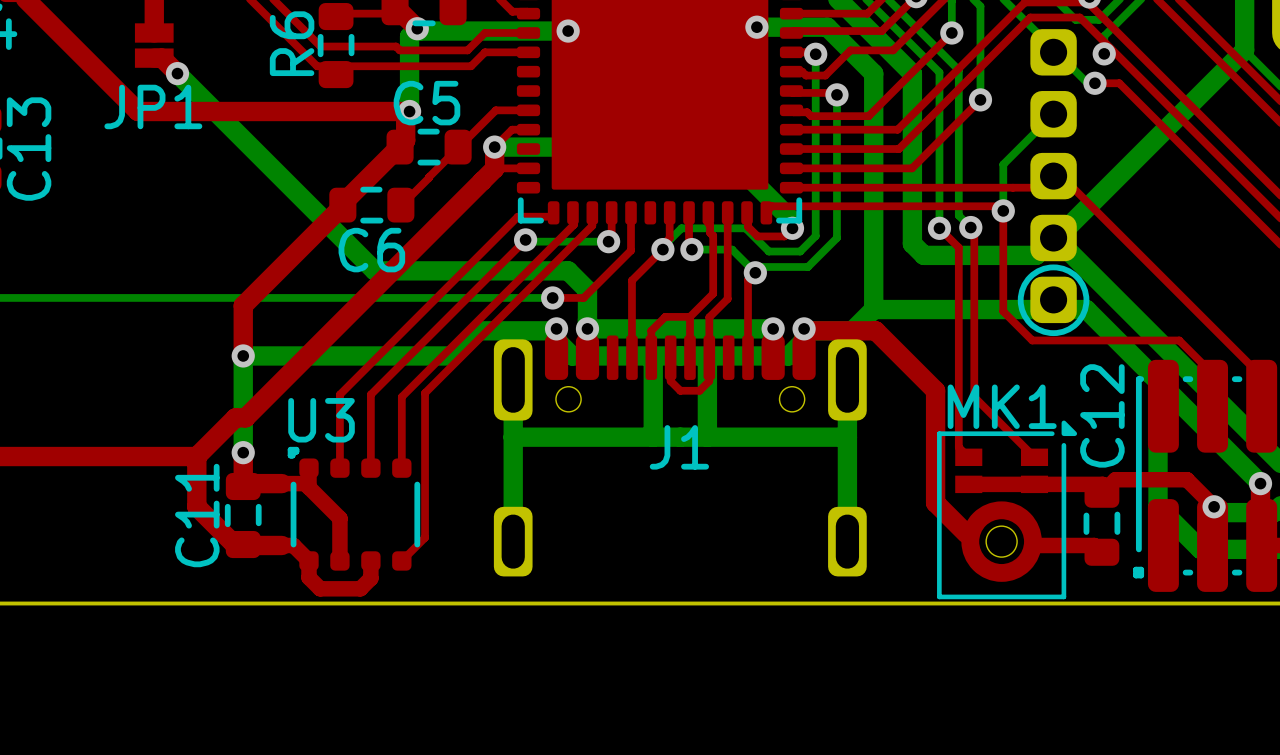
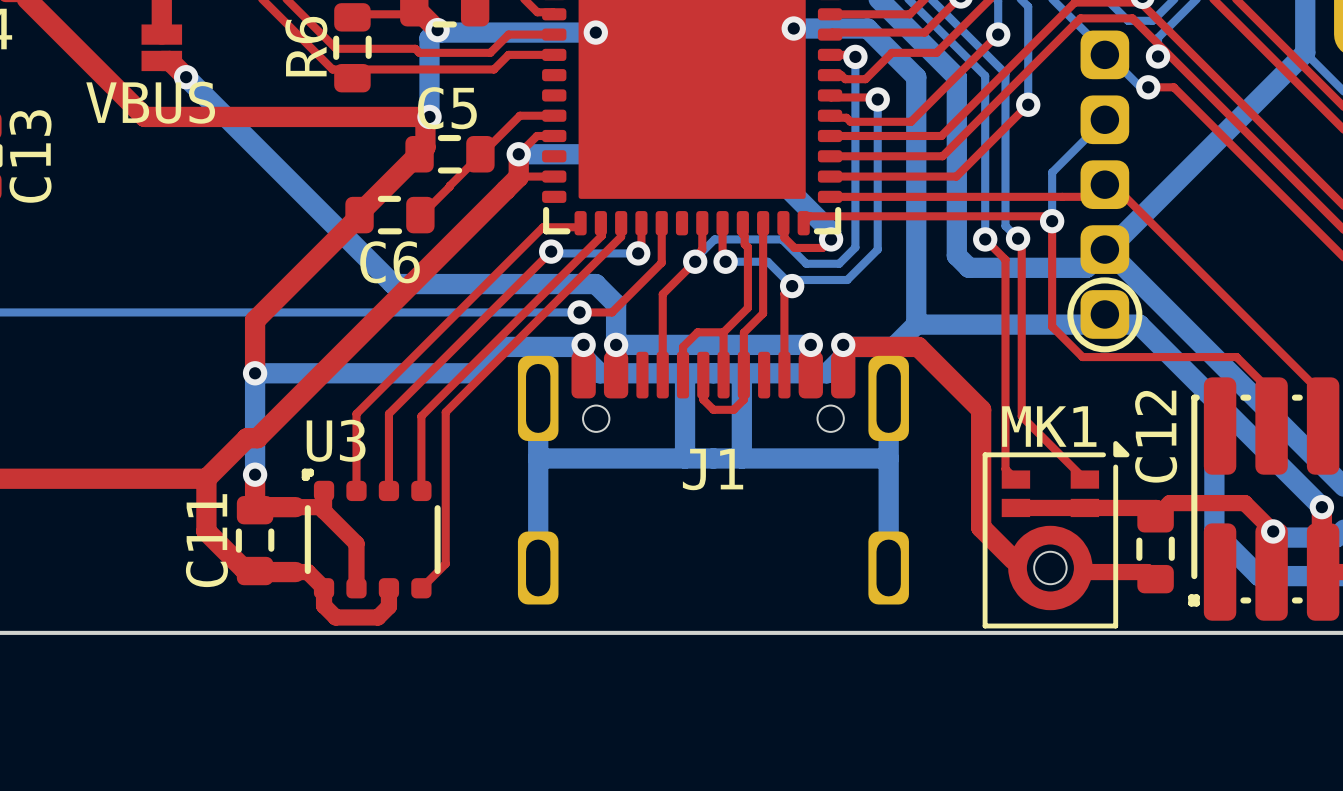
text: none -> VBUS (150, 102)
JP1 name: JP1 (153, 106) -> none

